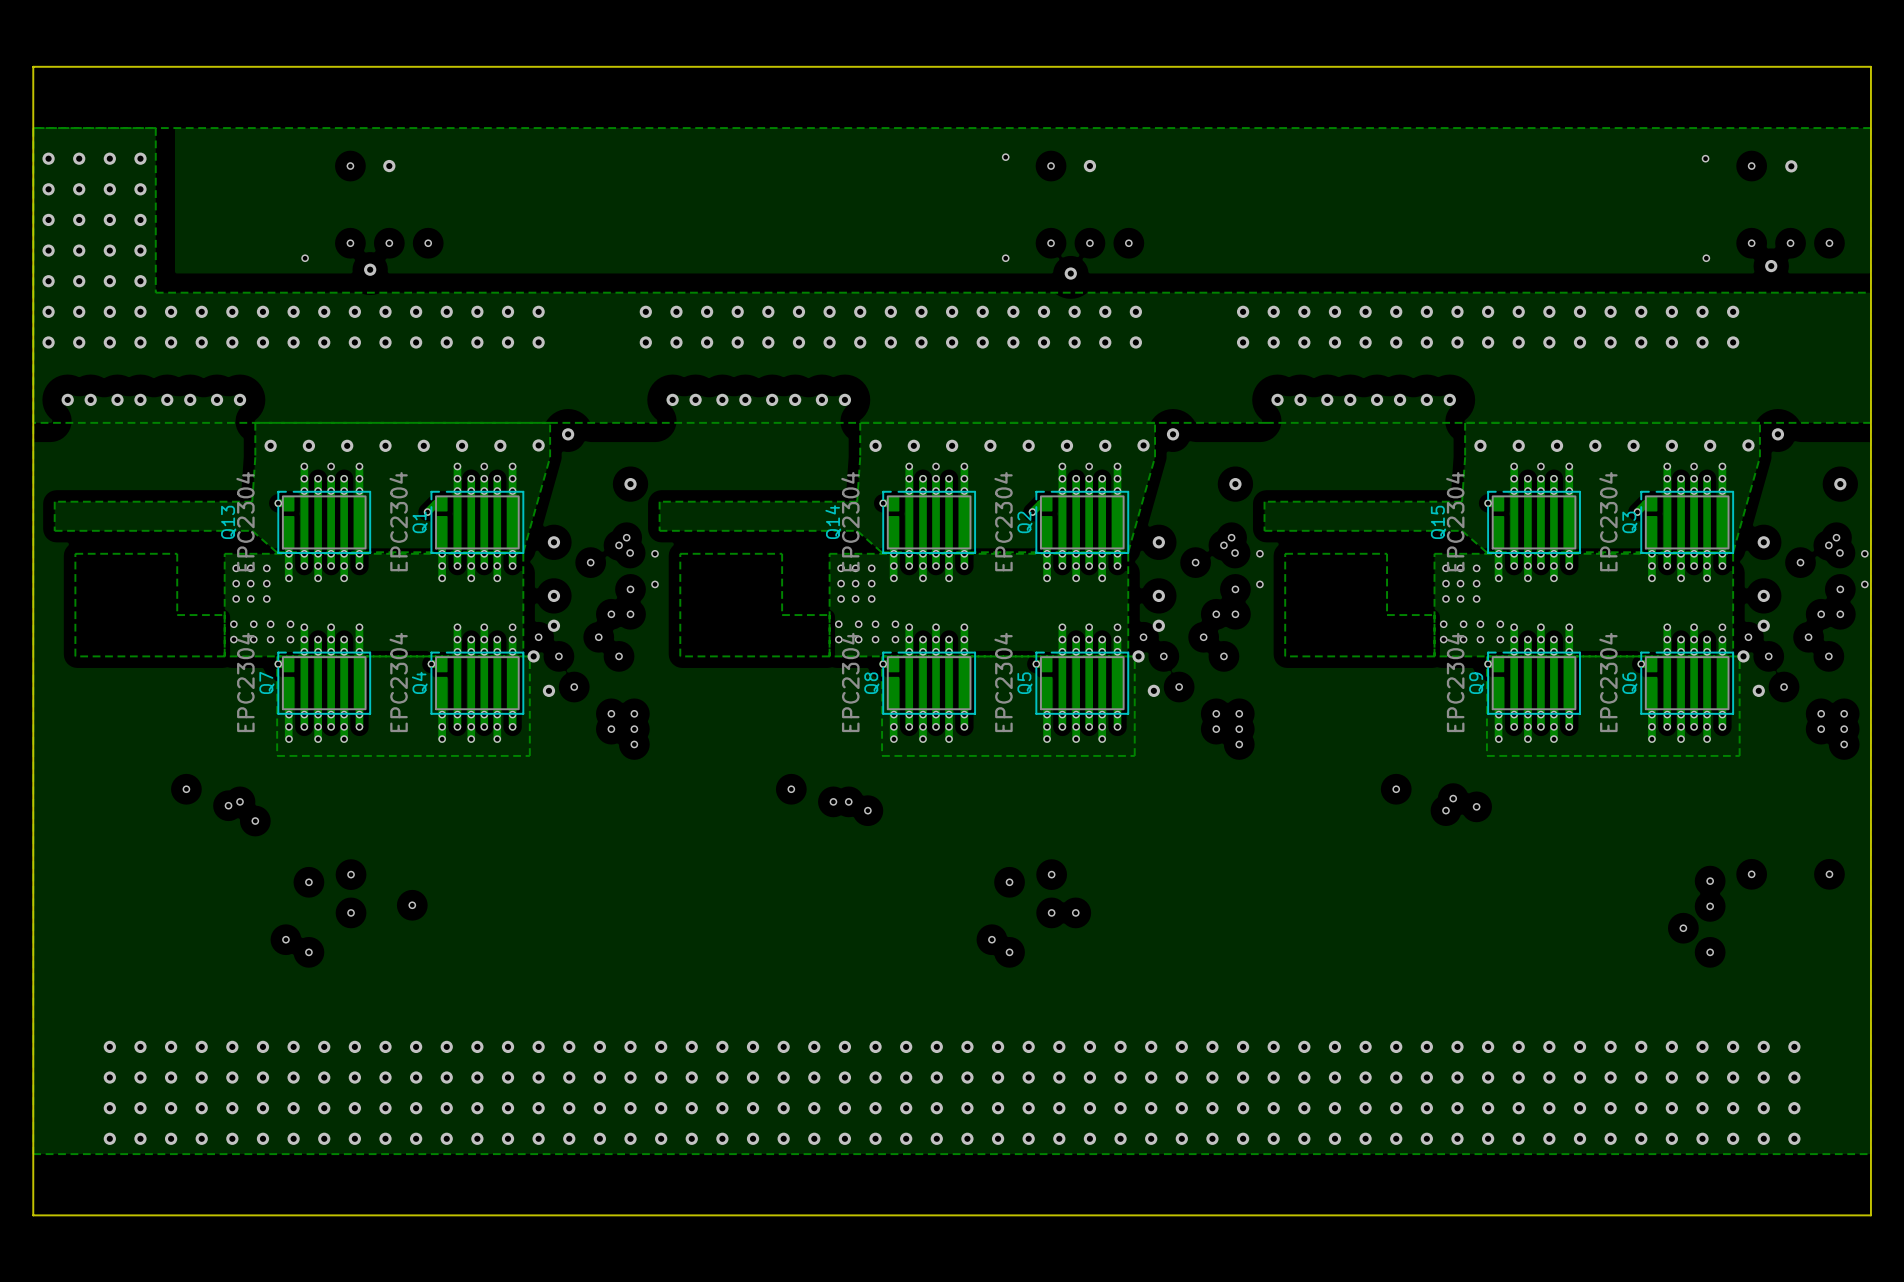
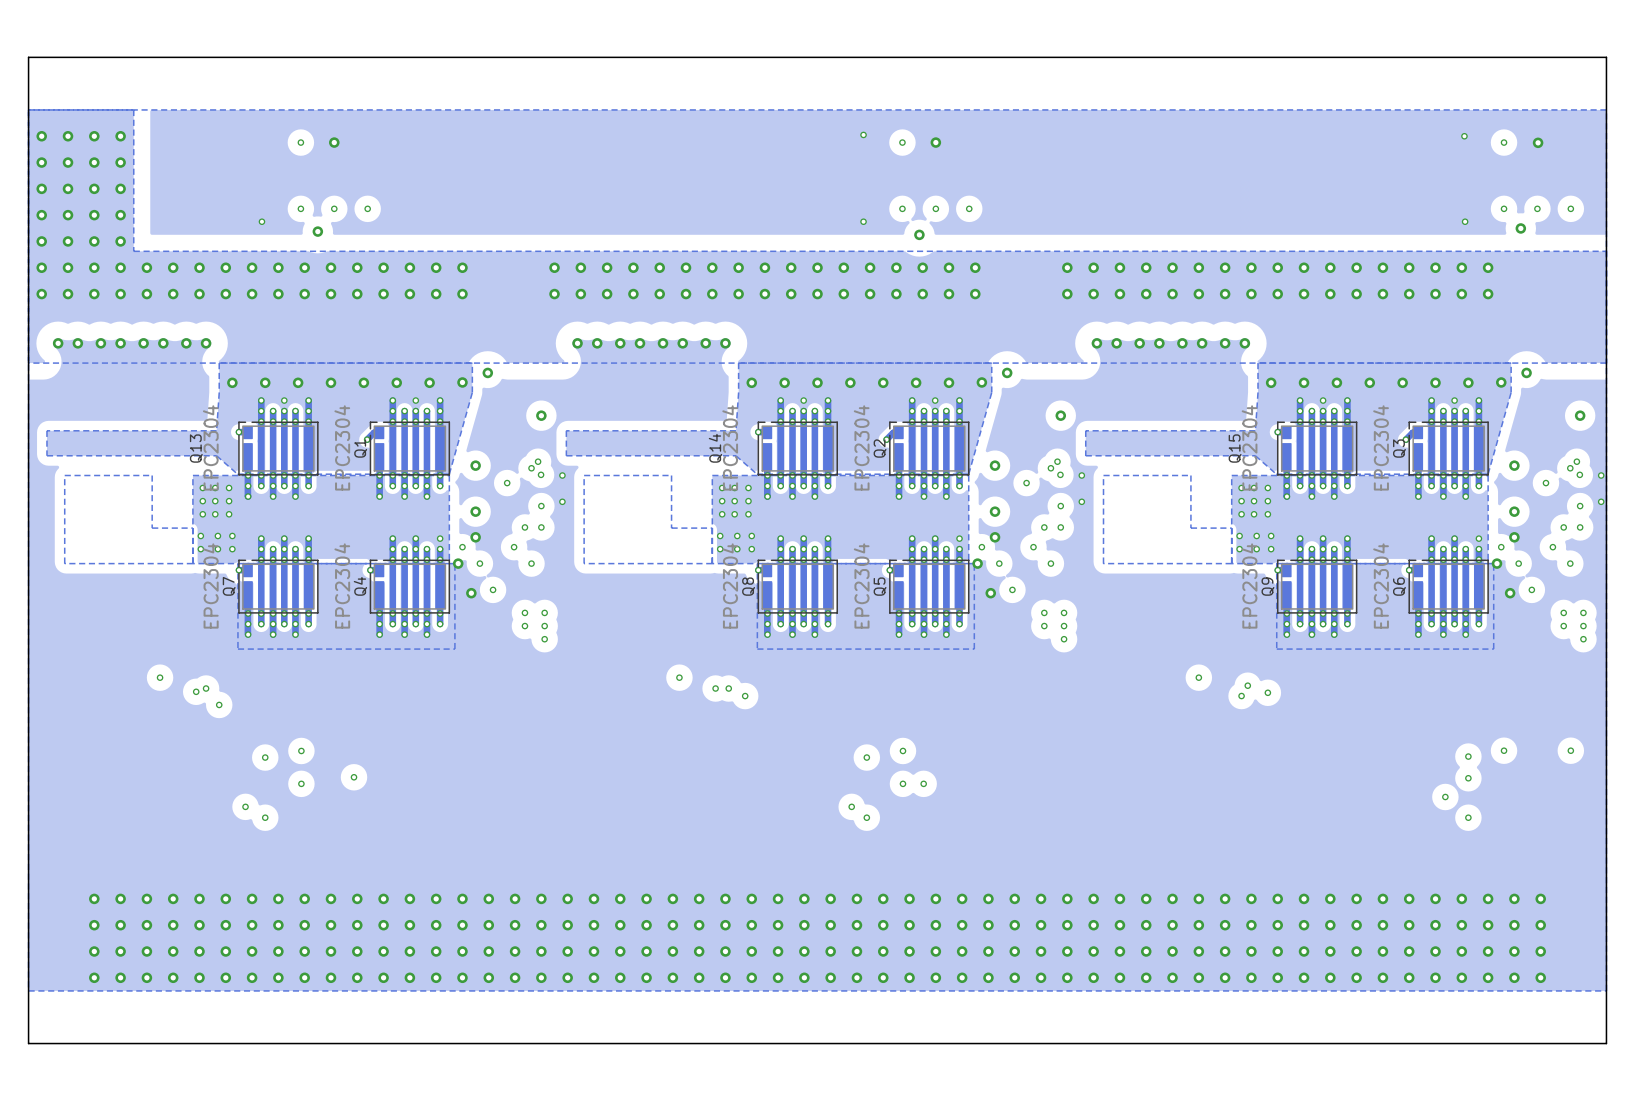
via: (290, 624) -> none
via: (895, 624) -> none
via: (1500, 624) -> none
via: (290, 639) -> none
via: (895, 639) -> none
via: (1500, 639) -> none

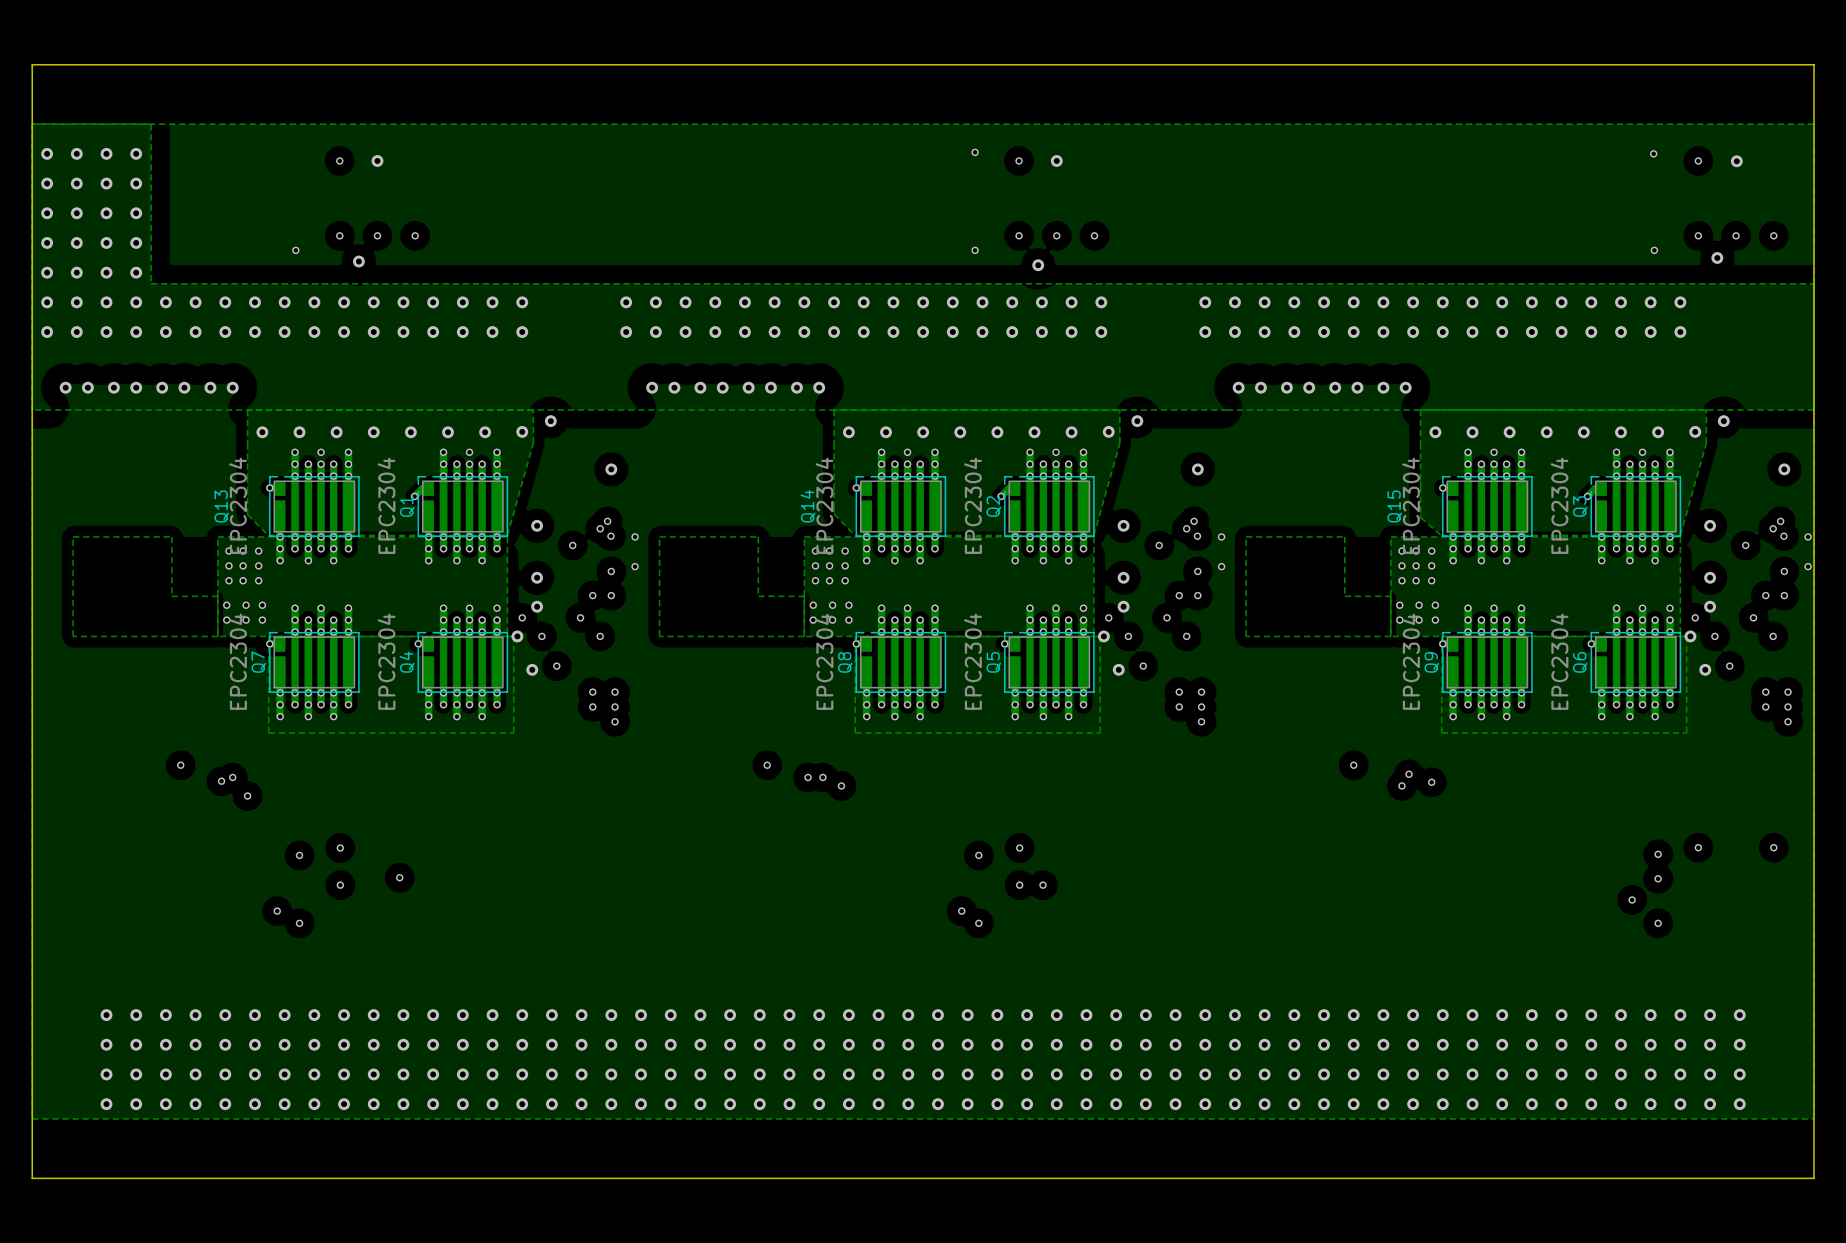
zone outline: (219, 392) (216, 430) (46, 430) (46, 455) (216, 455) (237, 474) -> (247, 443) (247, 514) (268, 535)
zone outline: (738, 392) (735, 430) (566, 430) (566, 455) (735, 455) (757, 474) -> (834, 443) (834, 513) (854, 535)
zone outline: (1258, 392) (1255, 430) (1085, 430) (1085, 455) (1255, 455) (1276, 474) -> (1420, 443) (1420, 517) (1441, 535)

